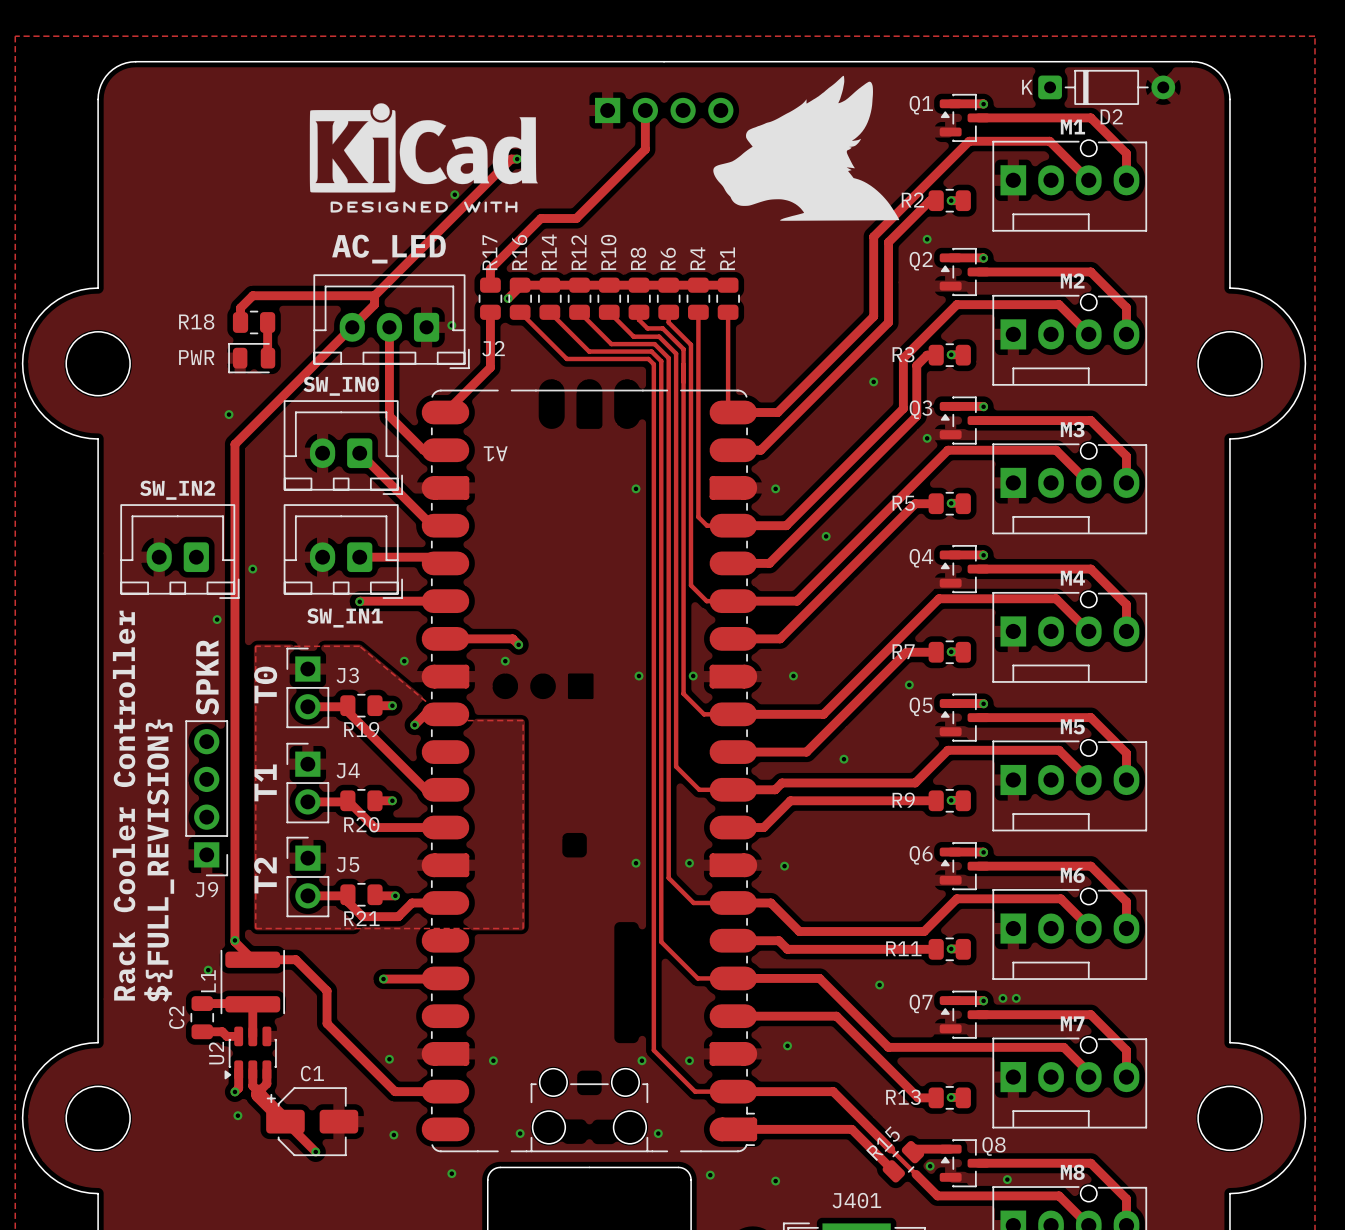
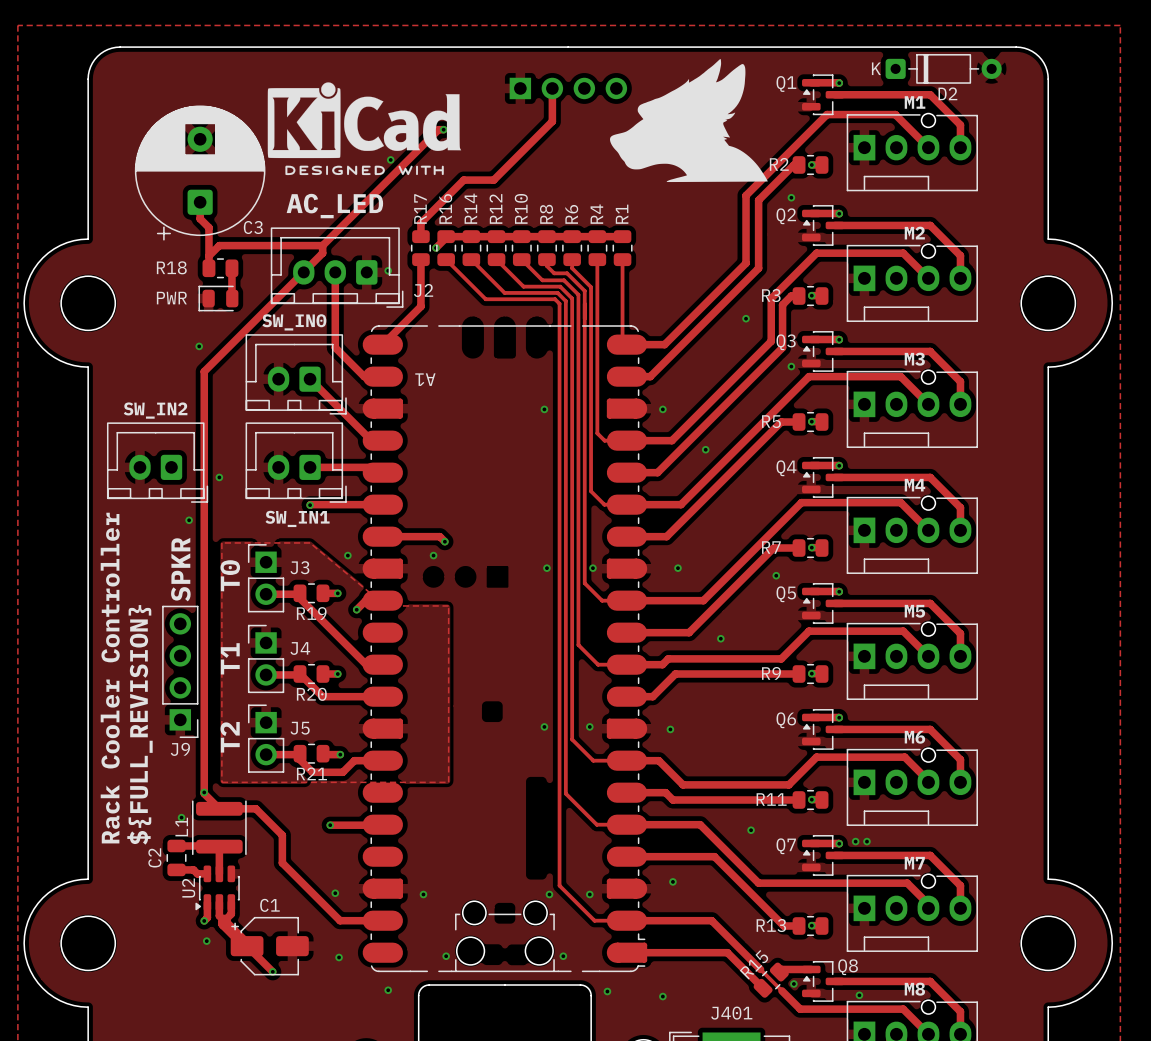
C3: none -> (200, 173)
track: none -> (200, 202) (200, 218) (208, 227) (208, 256)

